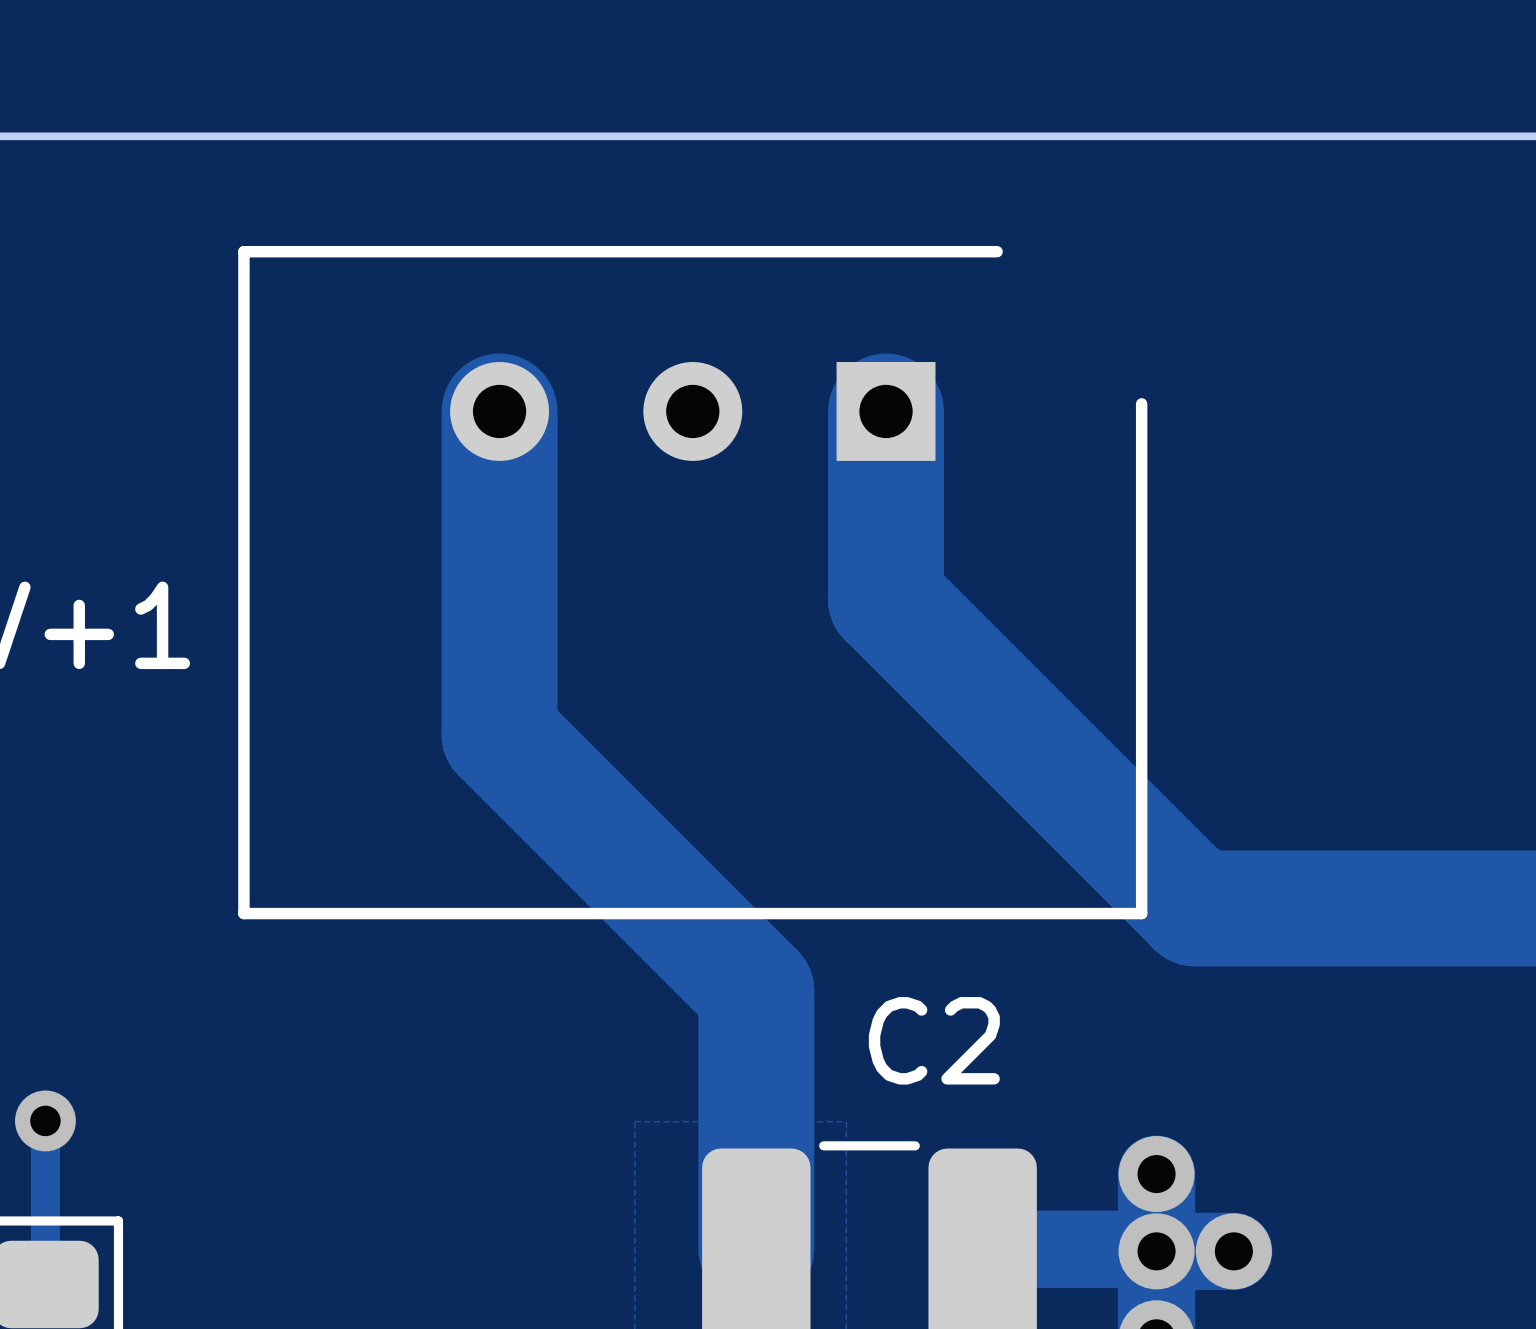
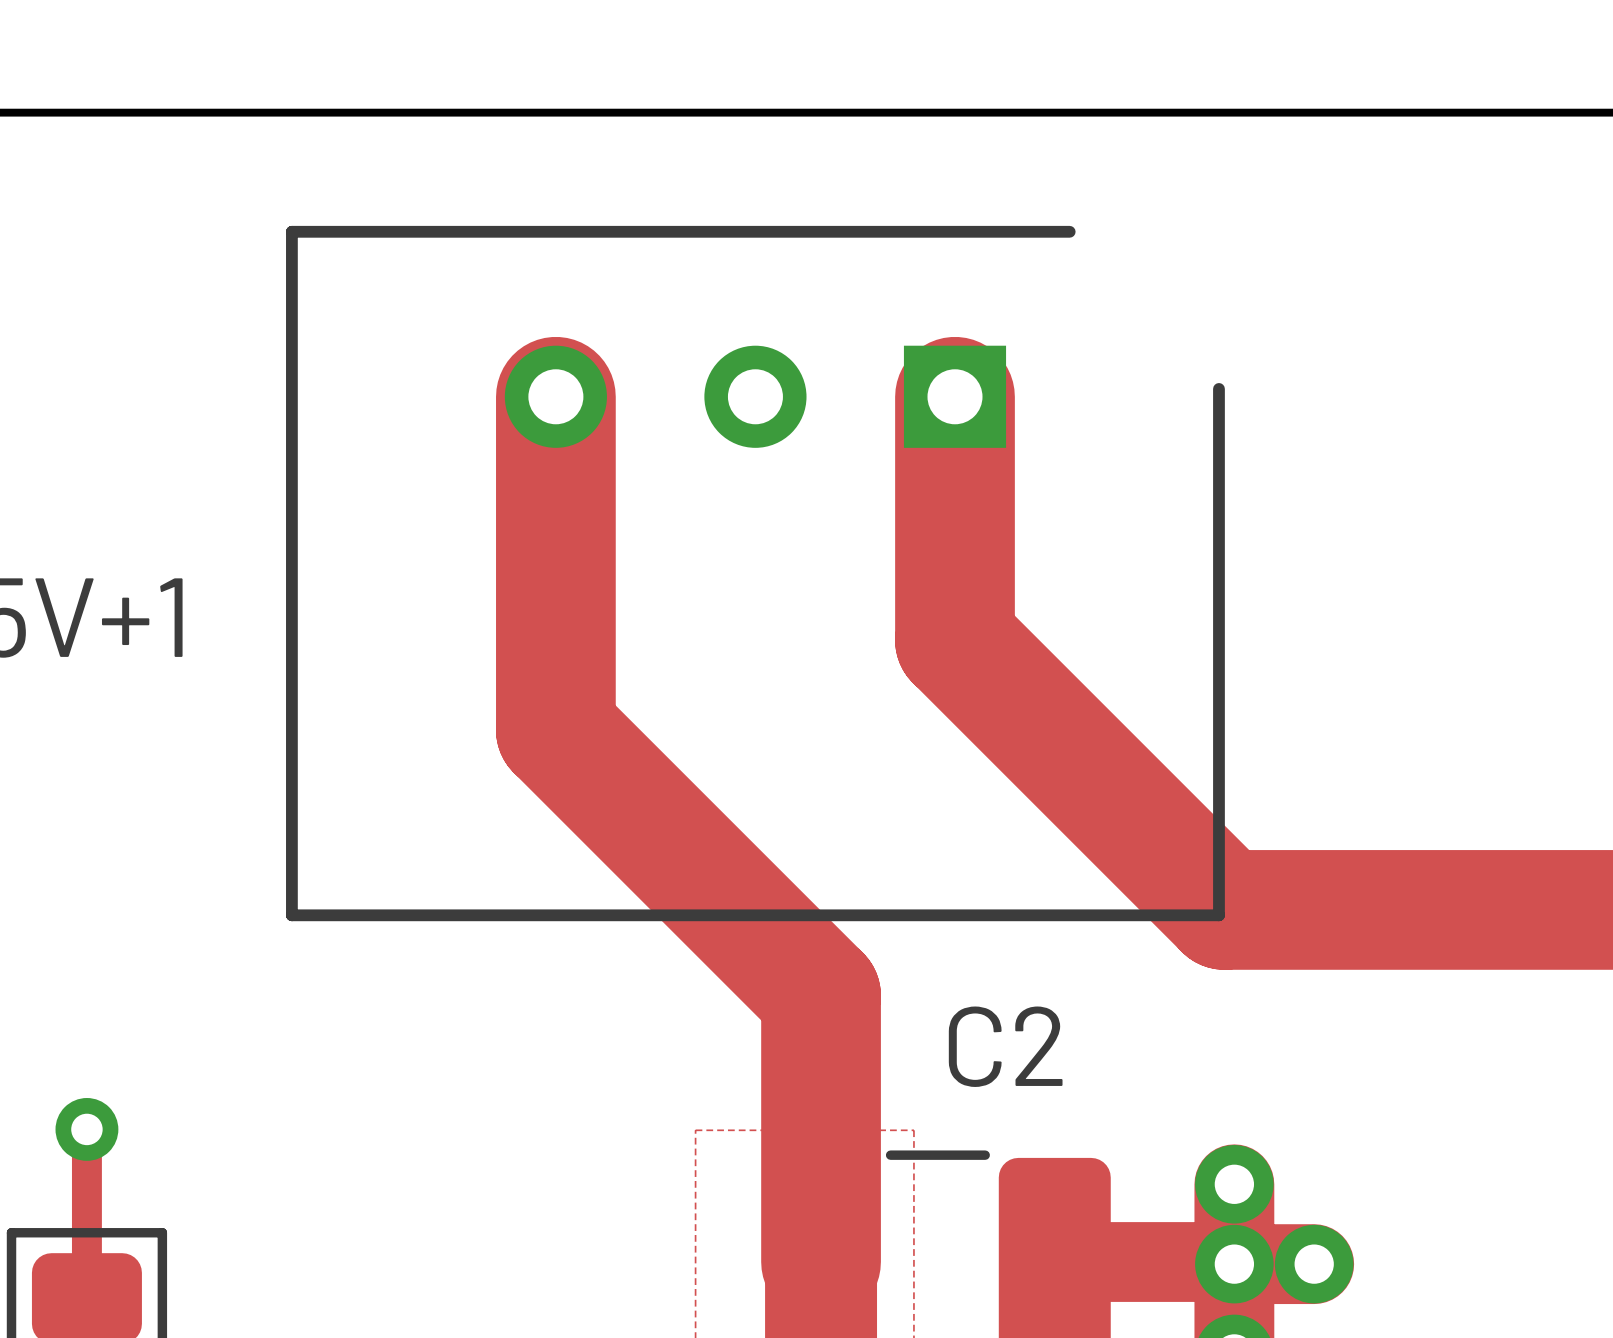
track: (886, 599) (1195, 908) -> (955, 590) (955, 640) (1224, 909) (1274, 909)

